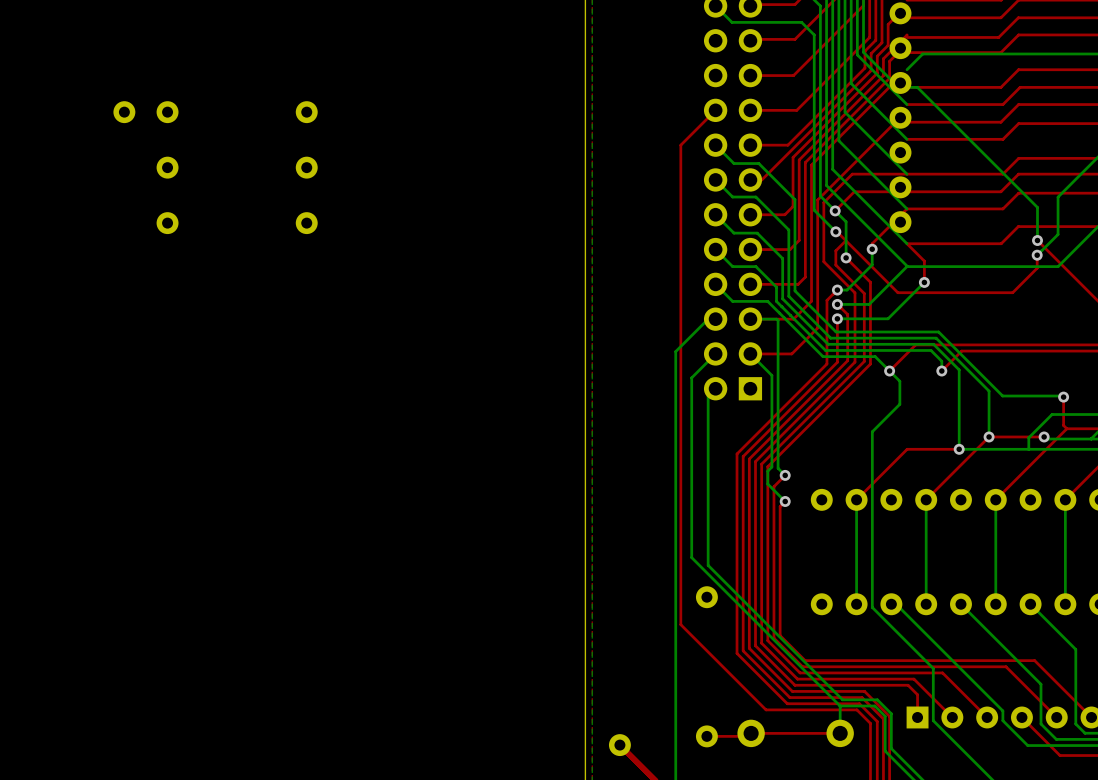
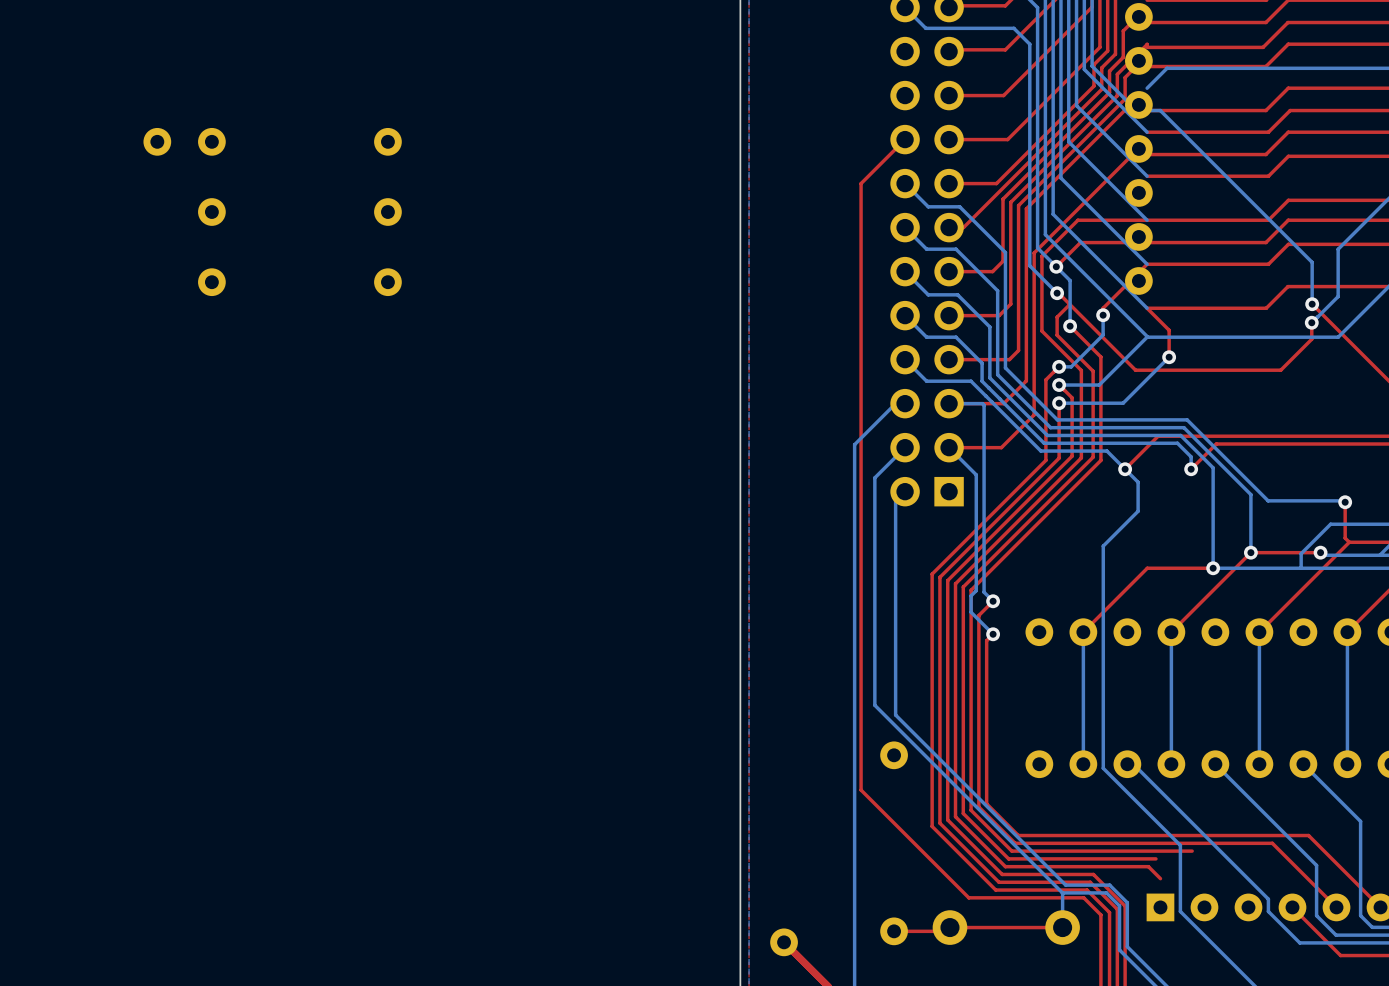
top track: (942, 672) (987, 717) -> none
top track: (913, 679) (952, 717) -> none
top track: (917, 694) (917, 717) -> none

